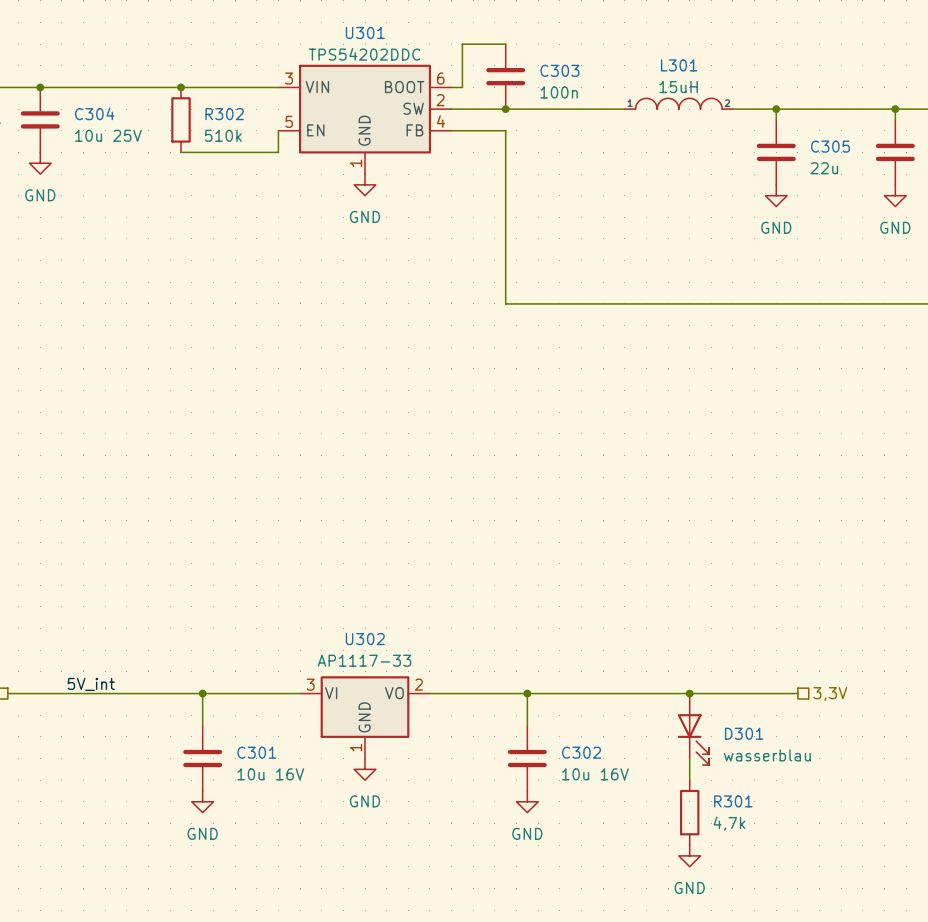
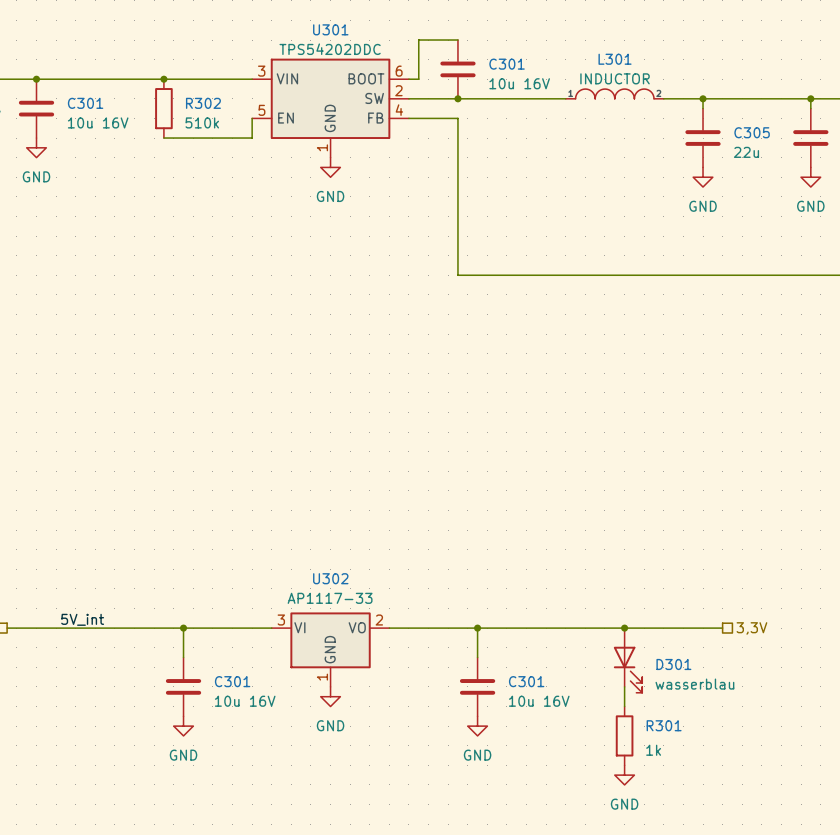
C303 name: C303 (559, 70) -> C301 (507, 64)
L301 value: 15uH (678, 87) -> INDUCTOR (615, 78)
C303 value: 100n (559, 92) -> 10u 16V (519, 83)
C304 name: C304 (94, 113) -> C301 (85, 103)
C304 value: 10u 25V (108, 135) -> 10u 16V (98, 122)
C302 name: C302 (581, 752) -> C301 (526, 681)
R301 value: 4,7k (729, 823) -> 1k (653, 750)

